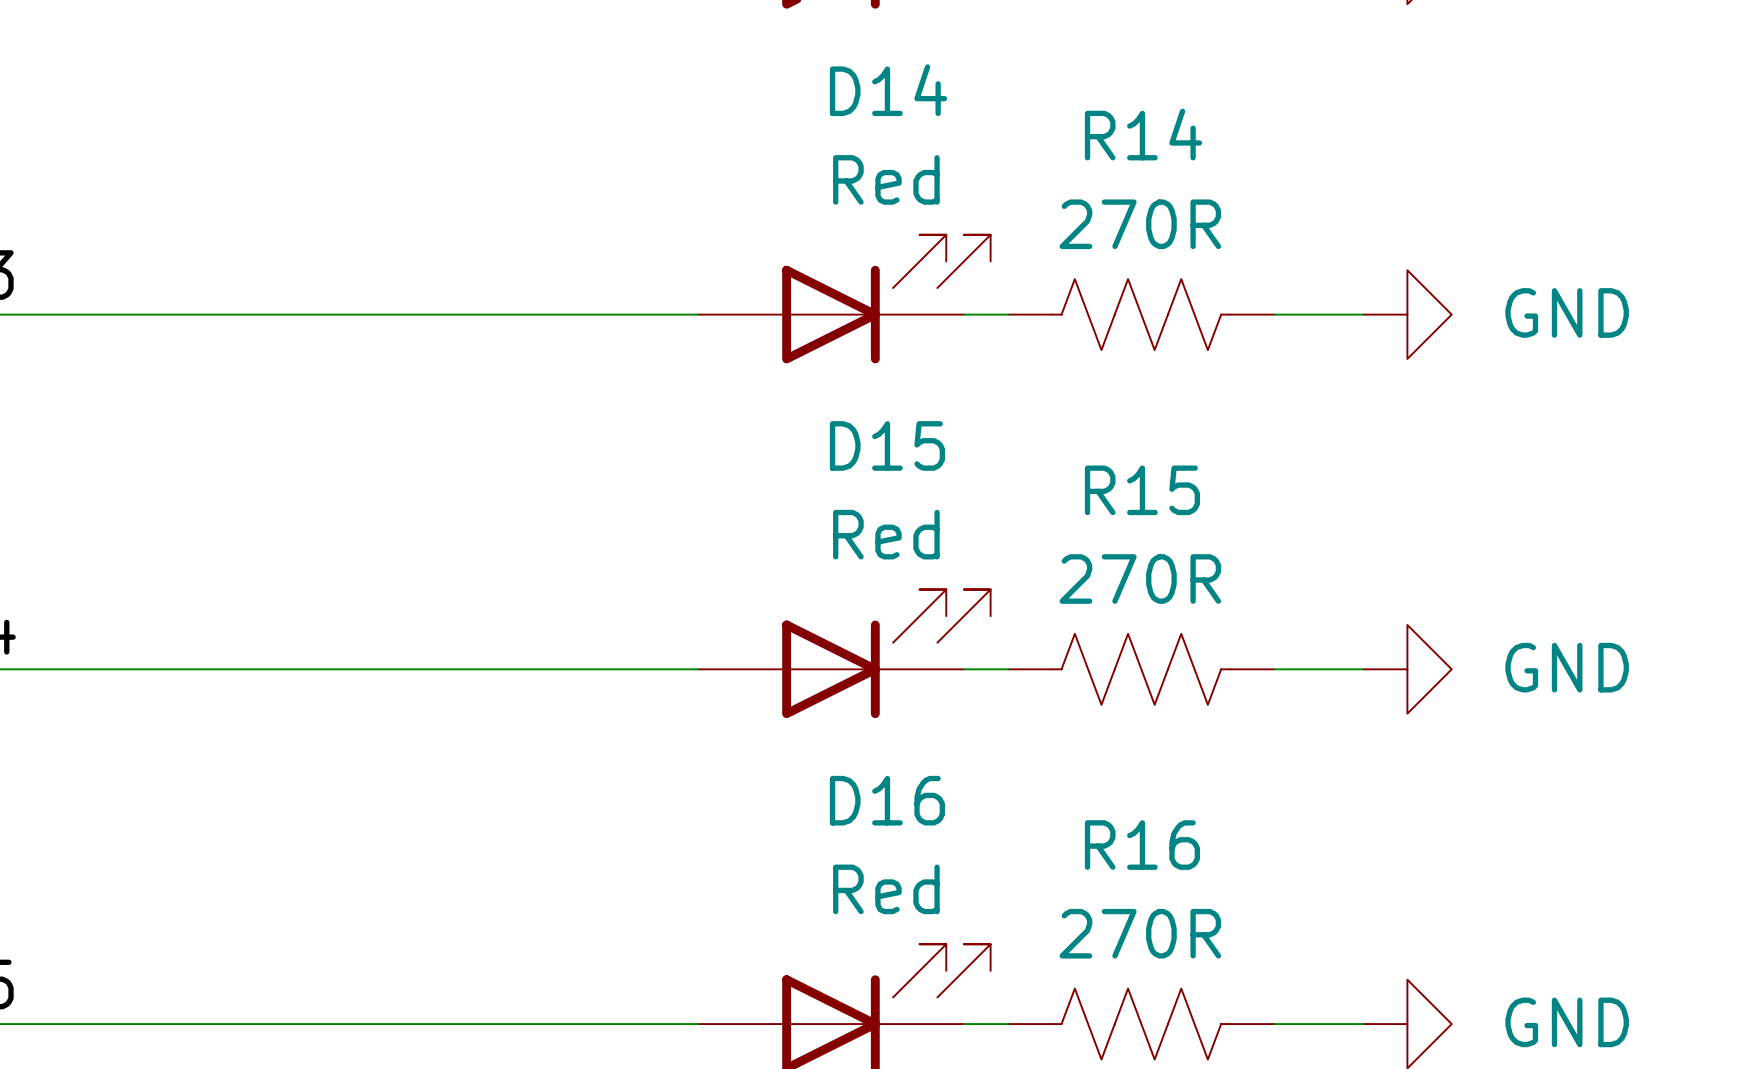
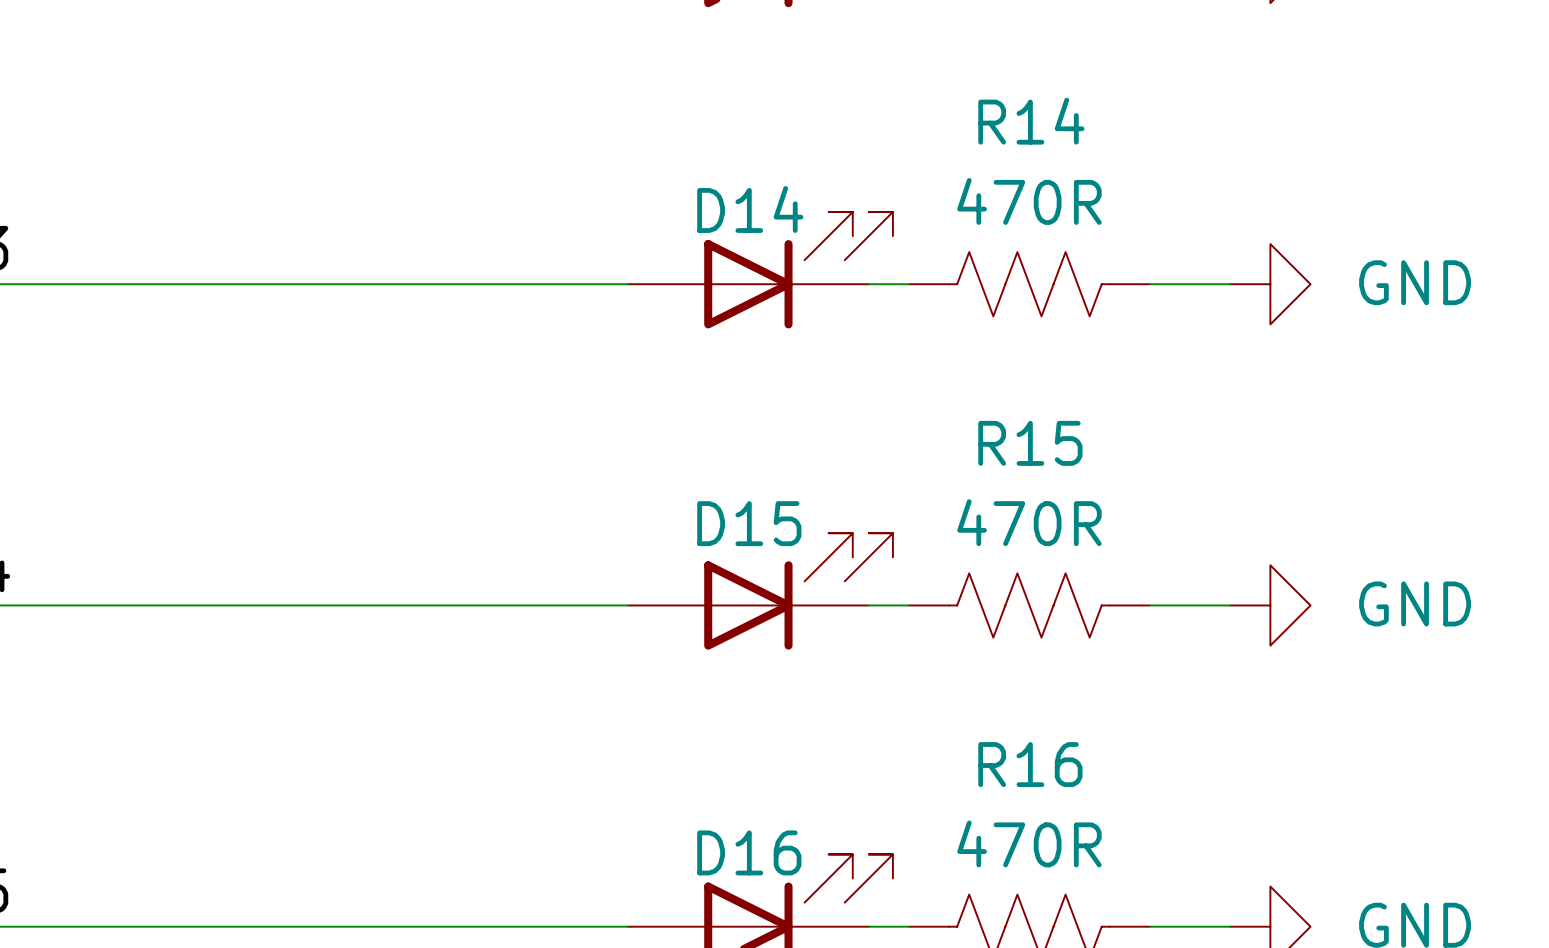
D14 name position: D14 (888, 90) -> D14 (750, 209)
D14 value: Red (886, 179) -> none
R14 value: 270R (1140, 224) -> 470R (1029, 201)
D15 name position: D15 (887, 445) -> D15 (749, 523)
D15 value: Red (886, 534) -> none
R15 value: 270R (1140, 578) -> 470R (1029, 522)
D16 name position: D16 (887, 800) -> D16 (749, 852)
D16 value: Red (886, 889) -> none
R16 value: 270R (1140, 933) -> 470R (1029, 843)

